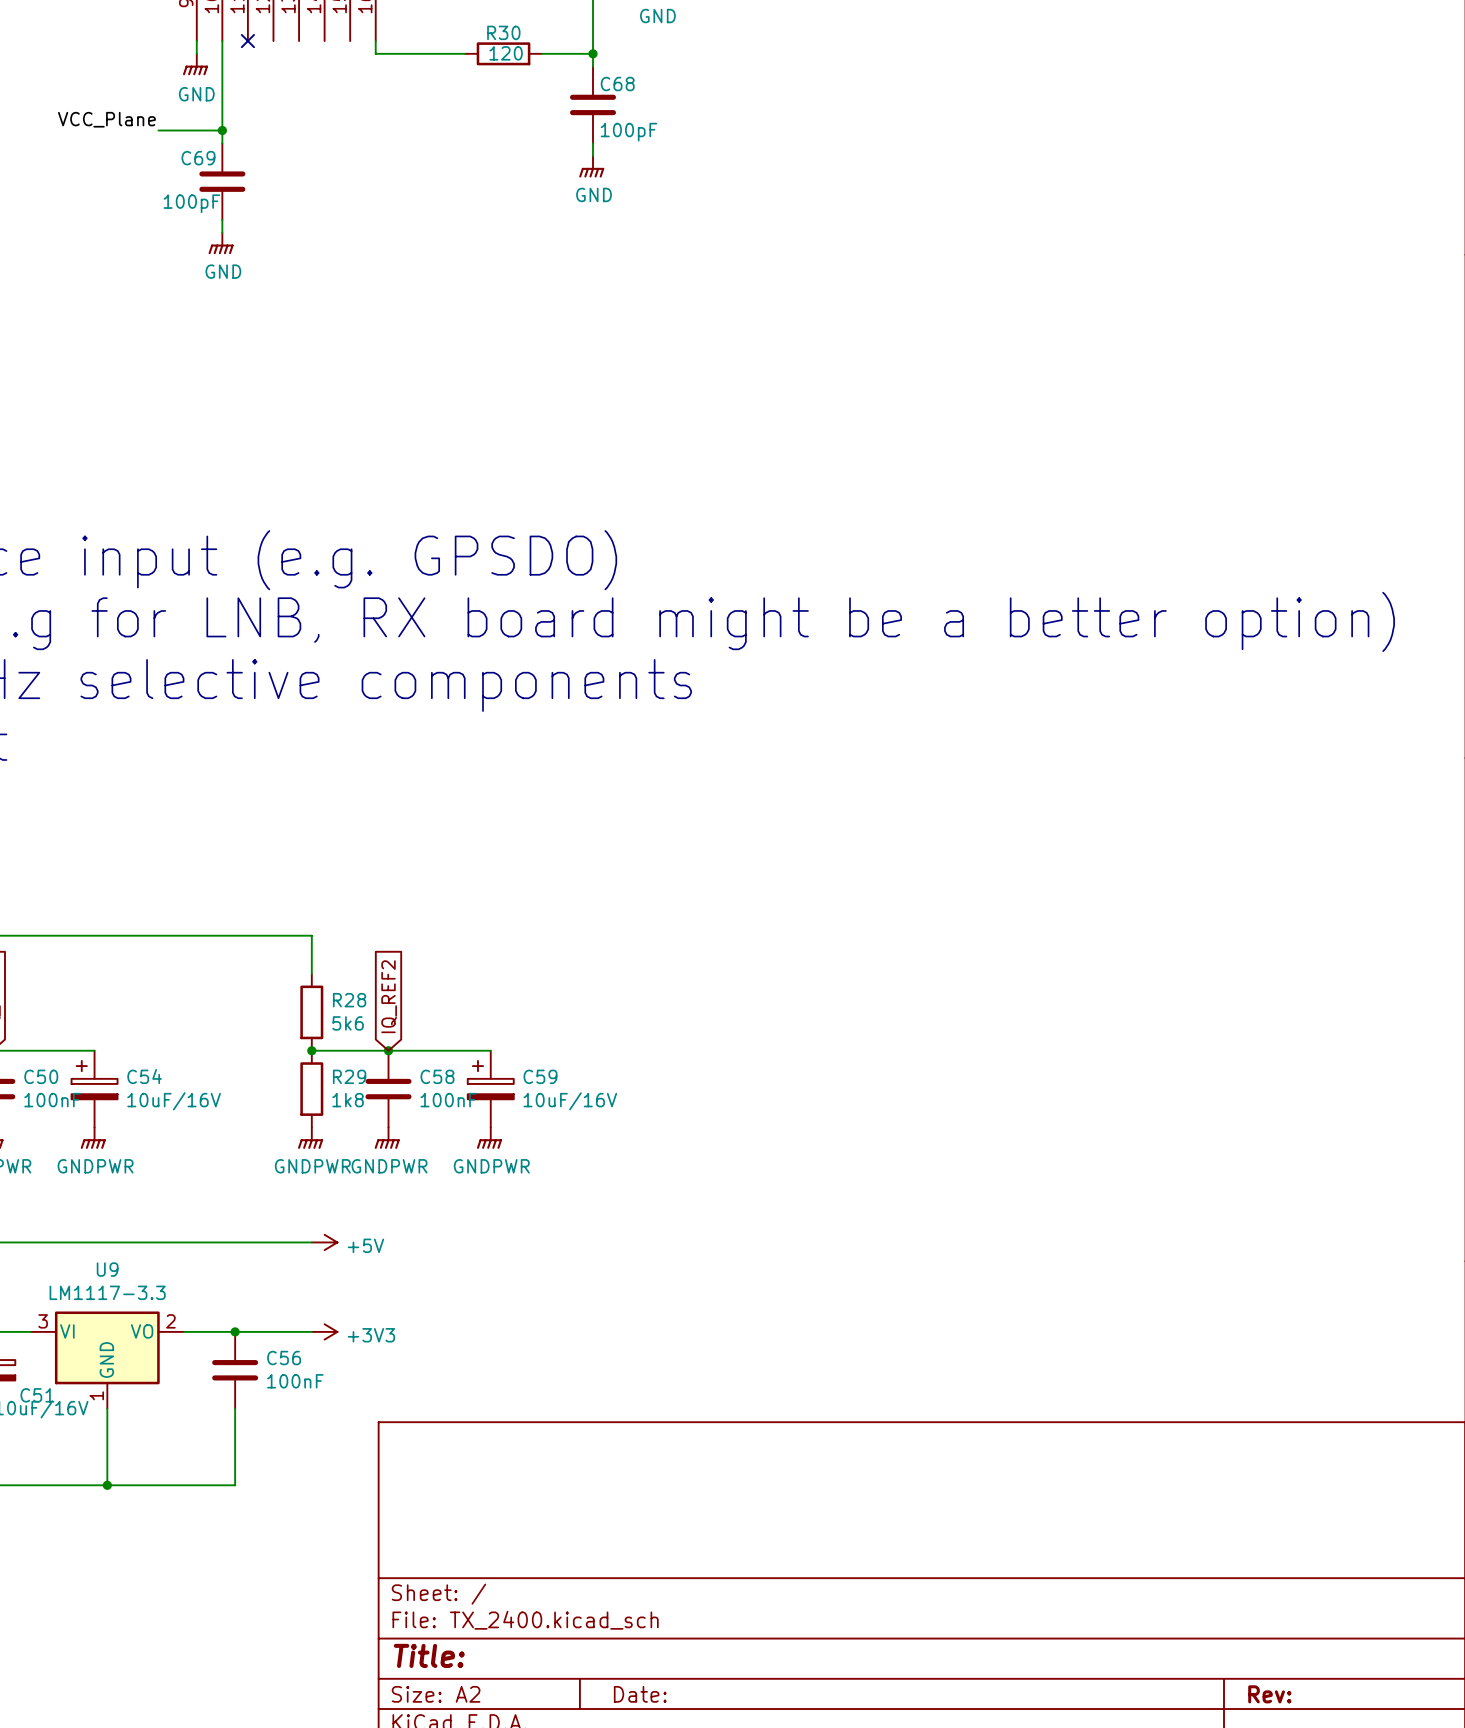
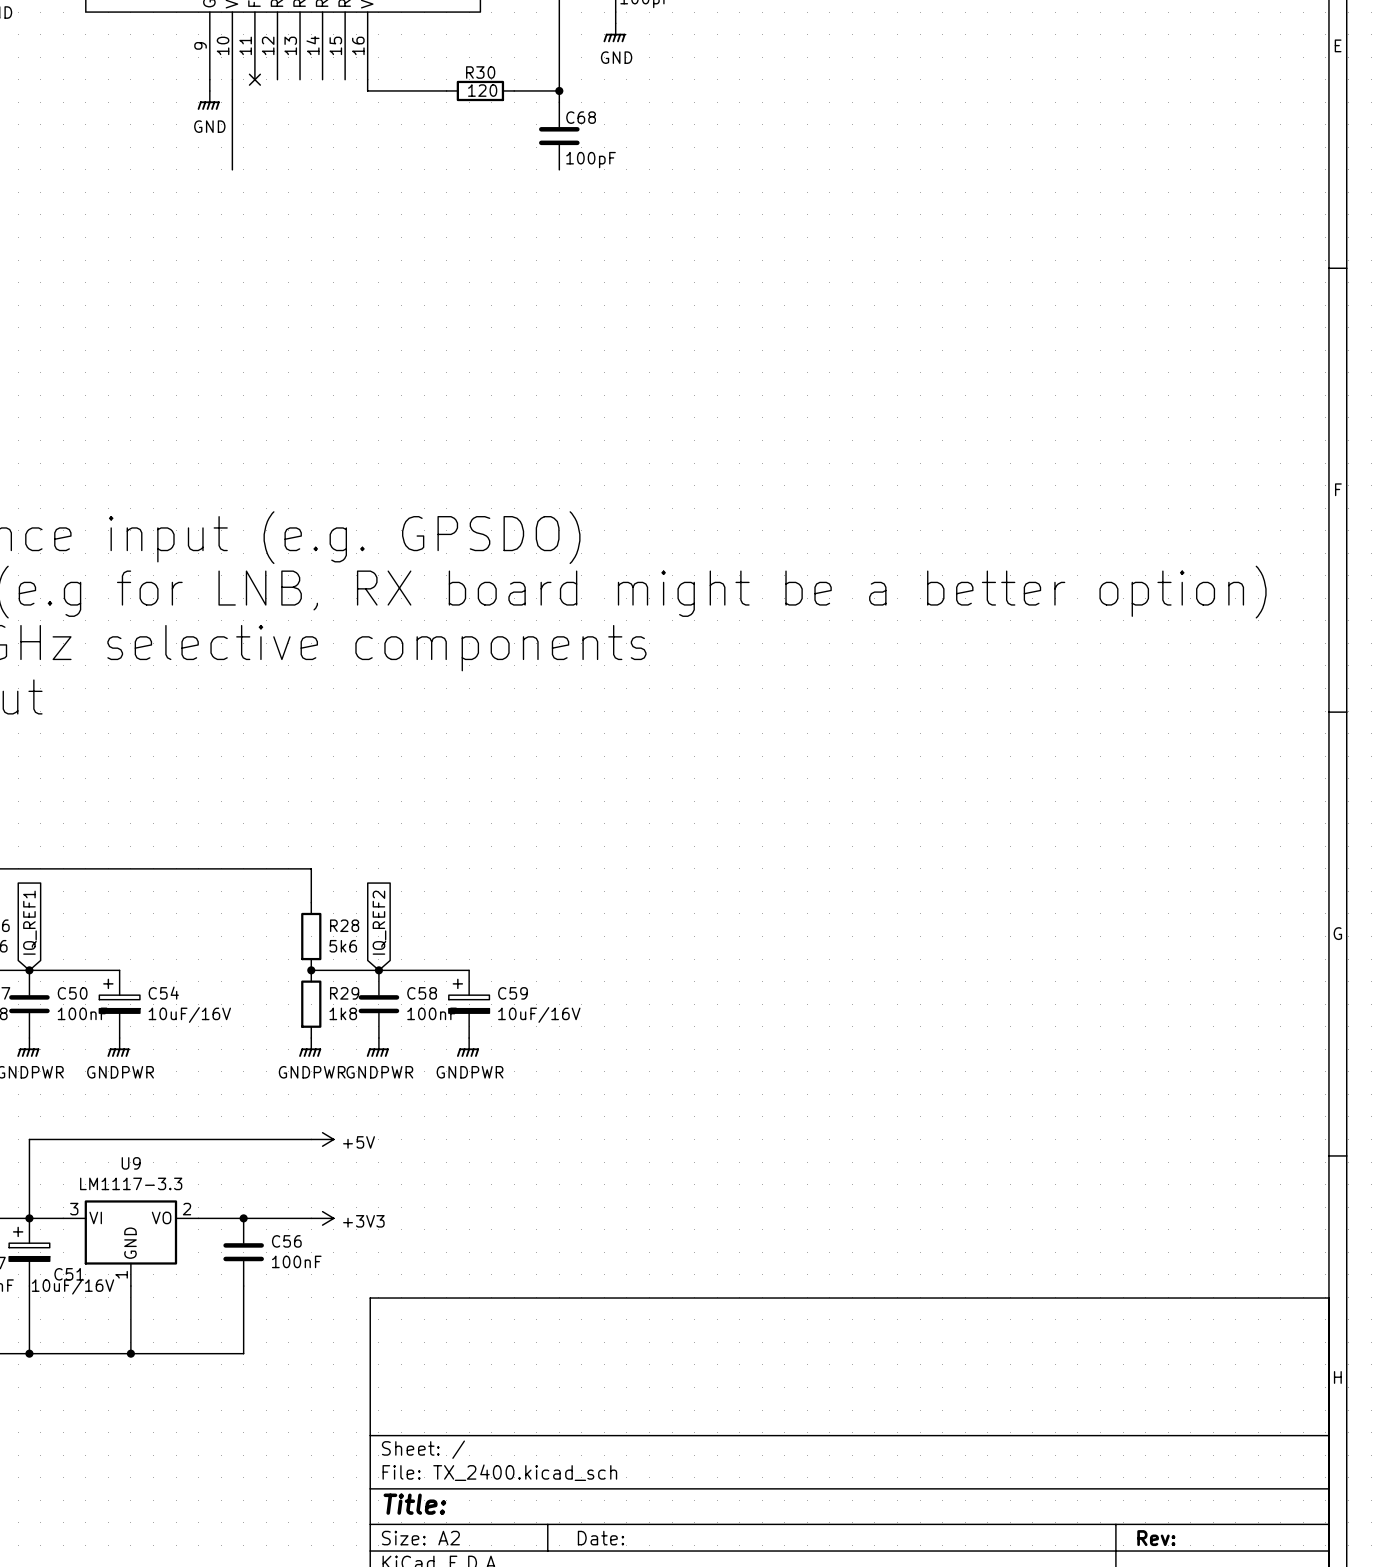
label: VCC_Plane (106, 119) -> none
wire: (158, 130) (222, 130) -> none
junction: (222, 130) -> none
wire: (593, 143) (593, 156) -> none
power symbol: GND (591, 166) -> none
C69: 100pF (222, 181) -> none
wire: (222, 219) (222, 232) -> none
power symbol: GND (221, 243) -> none

